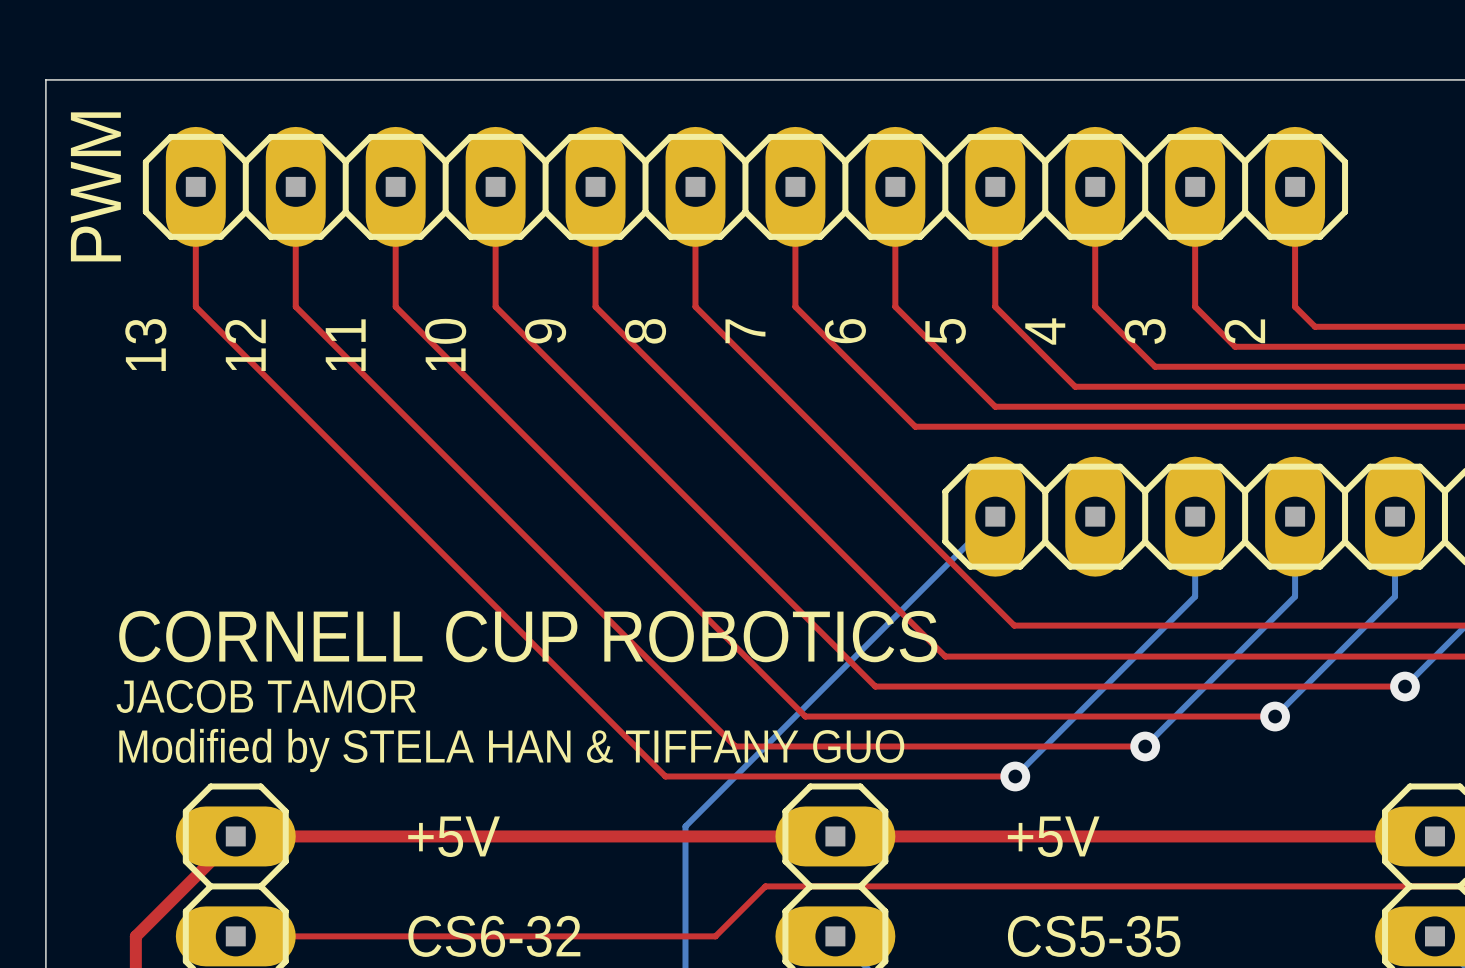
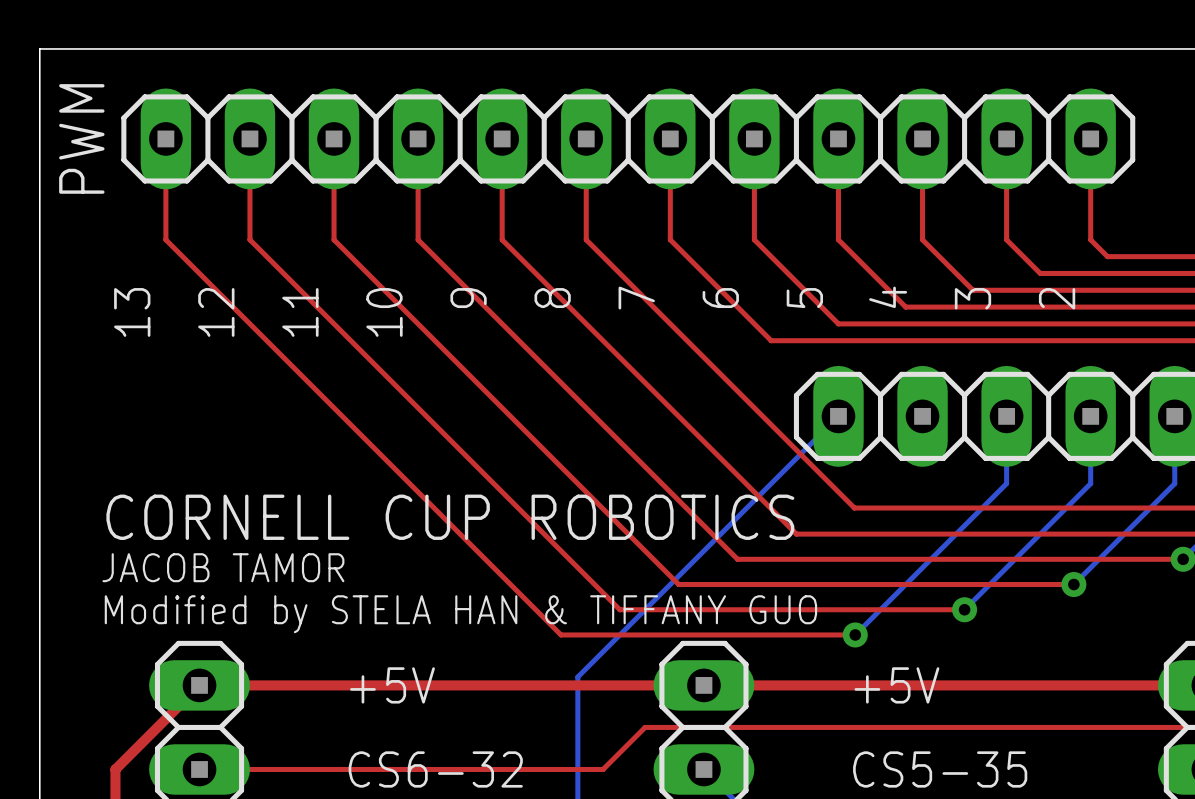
text position: 9 (545, 331) -> 9 (468, 298)
text position: 8 (645, 331) -> 8 (552, 298)
text position: 7 (745, 331) -> 7 (636, 298)
text position: 6 (845, 331) -> 6 (720, 298)
text position: 5 (945, 331) -> 5 (804, 298)
text position: 4 (1045, 331) -> 4 (888, 297)
text position: 3 (1145, 331) -> 3 (972, 298)
text position: 2 (1244, 331) -> 2 (1057, 298)
text position: 10 (445, 344) -> 10 (384, 312)
text position: 13 (145, 345) -> 13 (132, 312)
text position: 12 (245, 345) -> 12 (216, 312)
text position: 11 (345, 345) -> 11 (300, 312)

